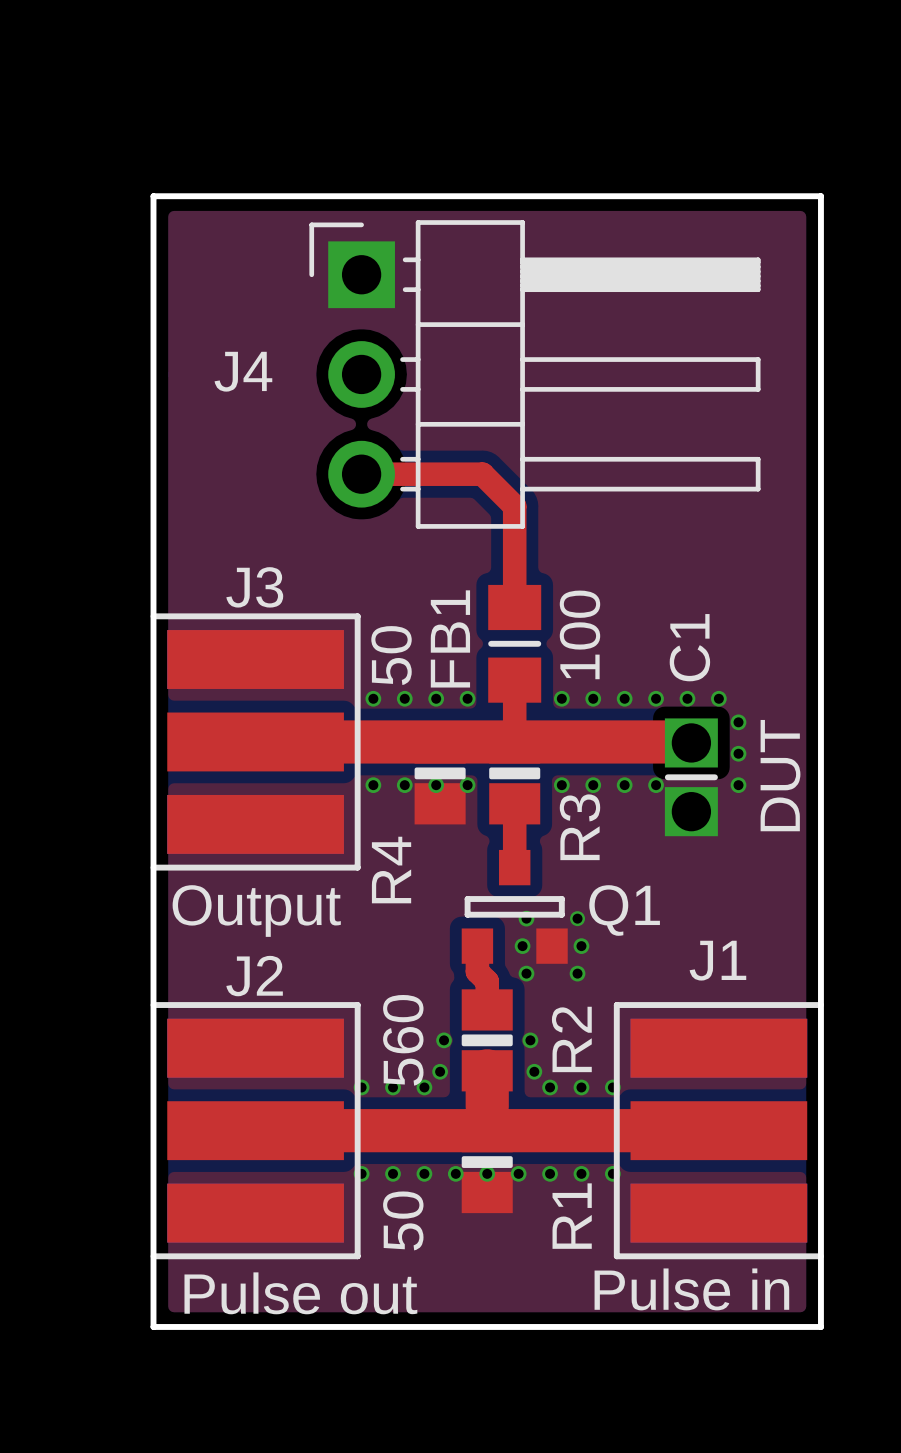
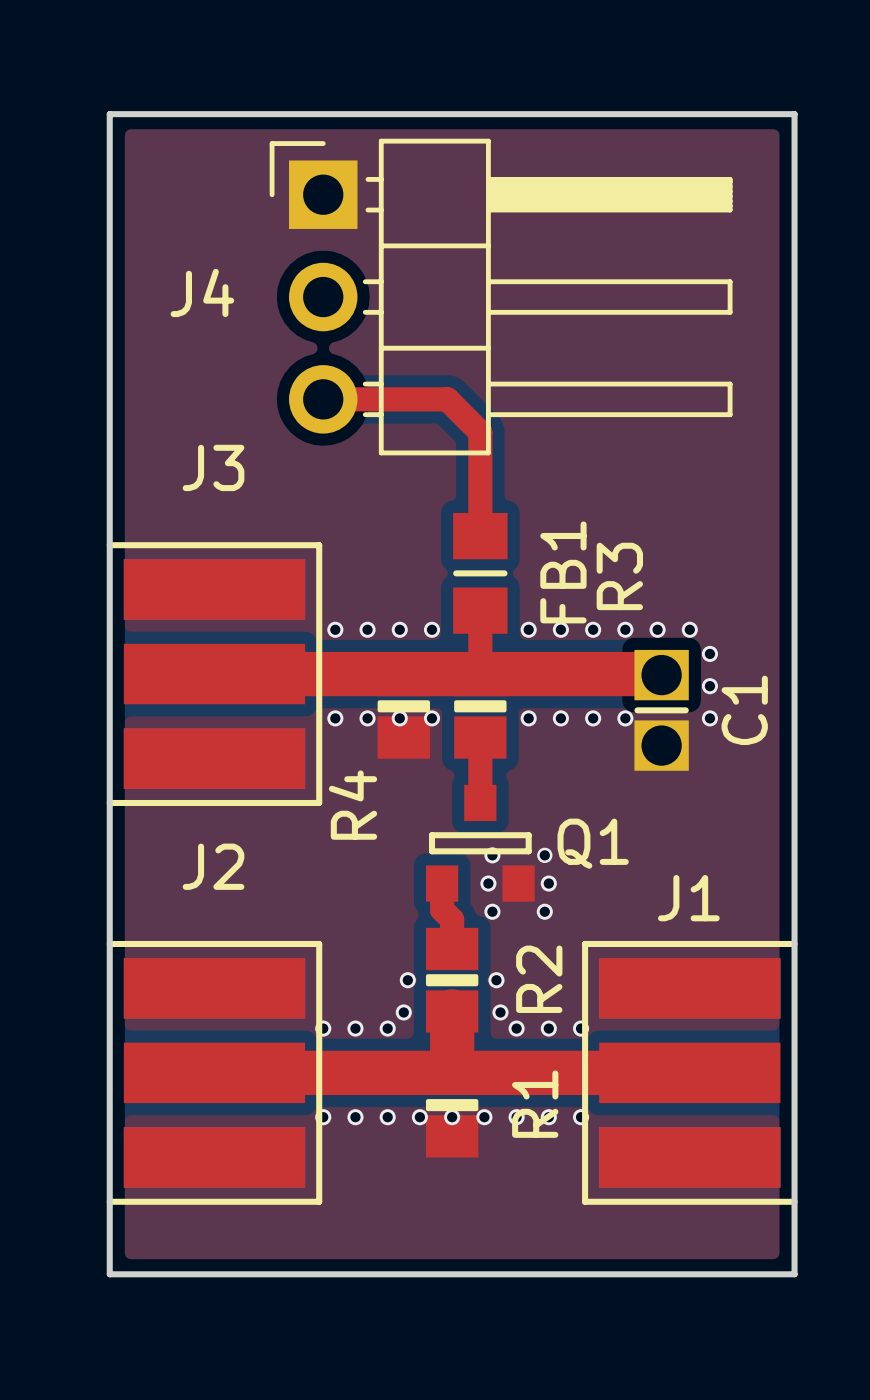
J3 name position: J3 (254, 587) -> J3 (213, 467)
R3 value: 100 (579, 634) -> none
FB1 name position: FB1 (450, 638) -> FB1 (563, 572)
C1 name position: C1 (689, 647) -> C1 (744, 710)
R4 value: 50 (391, 655) -> none
C1 value: DUT (780, 775) -> none
R3 name position: R3 (579, 827) -> R3 (619, 576)
J3 value: Output (256, 911) -> none
J2 name position: J2 (254, 976) -> J2 (213, 866)
R2 value: 560 (403, 1040) -> none
R1 name position: R1 (572, 1216) -> R1 (535, 1104)
R1 value: 50 (403, 1220) -> none
J1 value: Pulse in (691, 1289) -> none
J2 value: Pulse out (300, 1293) -> none

